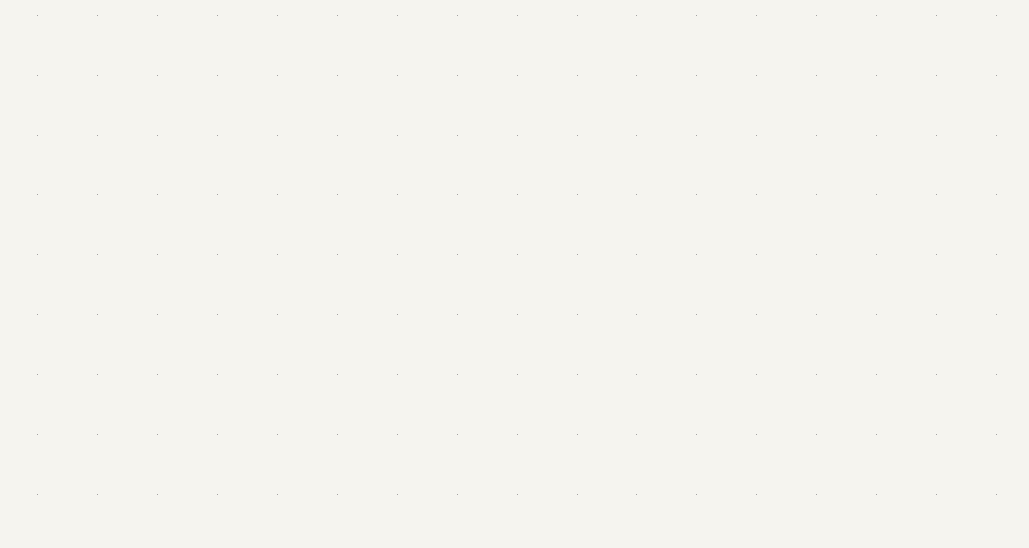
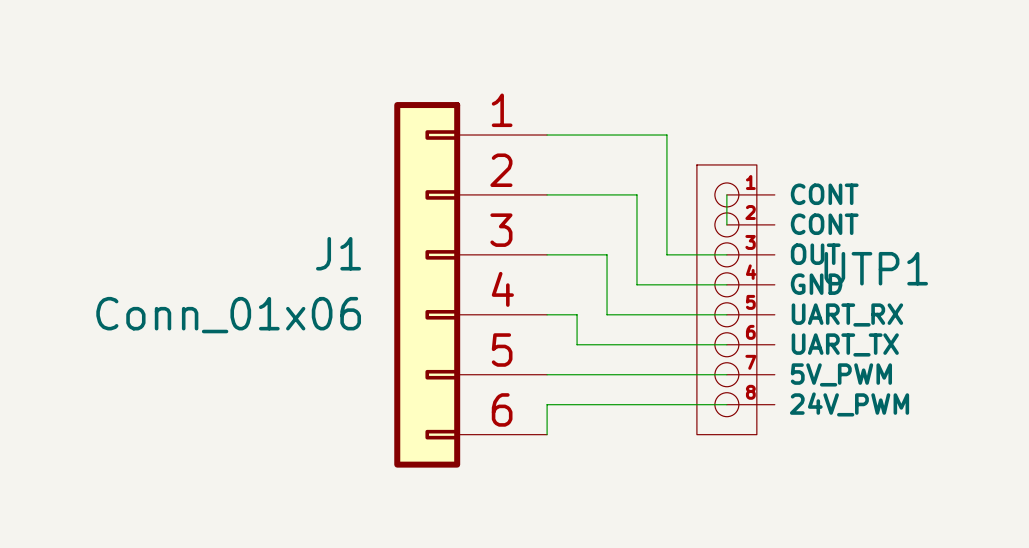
wire: none -> (547, 135) (666, 135) (666, 254) (726, 254)
wire: none -> (547, 194) (636, 194) (636, 284) (726, 284)
wire: none -> (726, 194) (726, 224)
wire: none -> (547, 254) (607, 254) (607, 314) (726, 314)
J1: none -> Conn_01x06 (470, 284)
UTP1: none -> (735, 299)
wire: none -> (547, 314) (577, 314) (577, 344) (726, 344)
wire: none -> (547, 374) (726, 374)
wire: none -> (726, 404) (547, 404) (547, 434)

